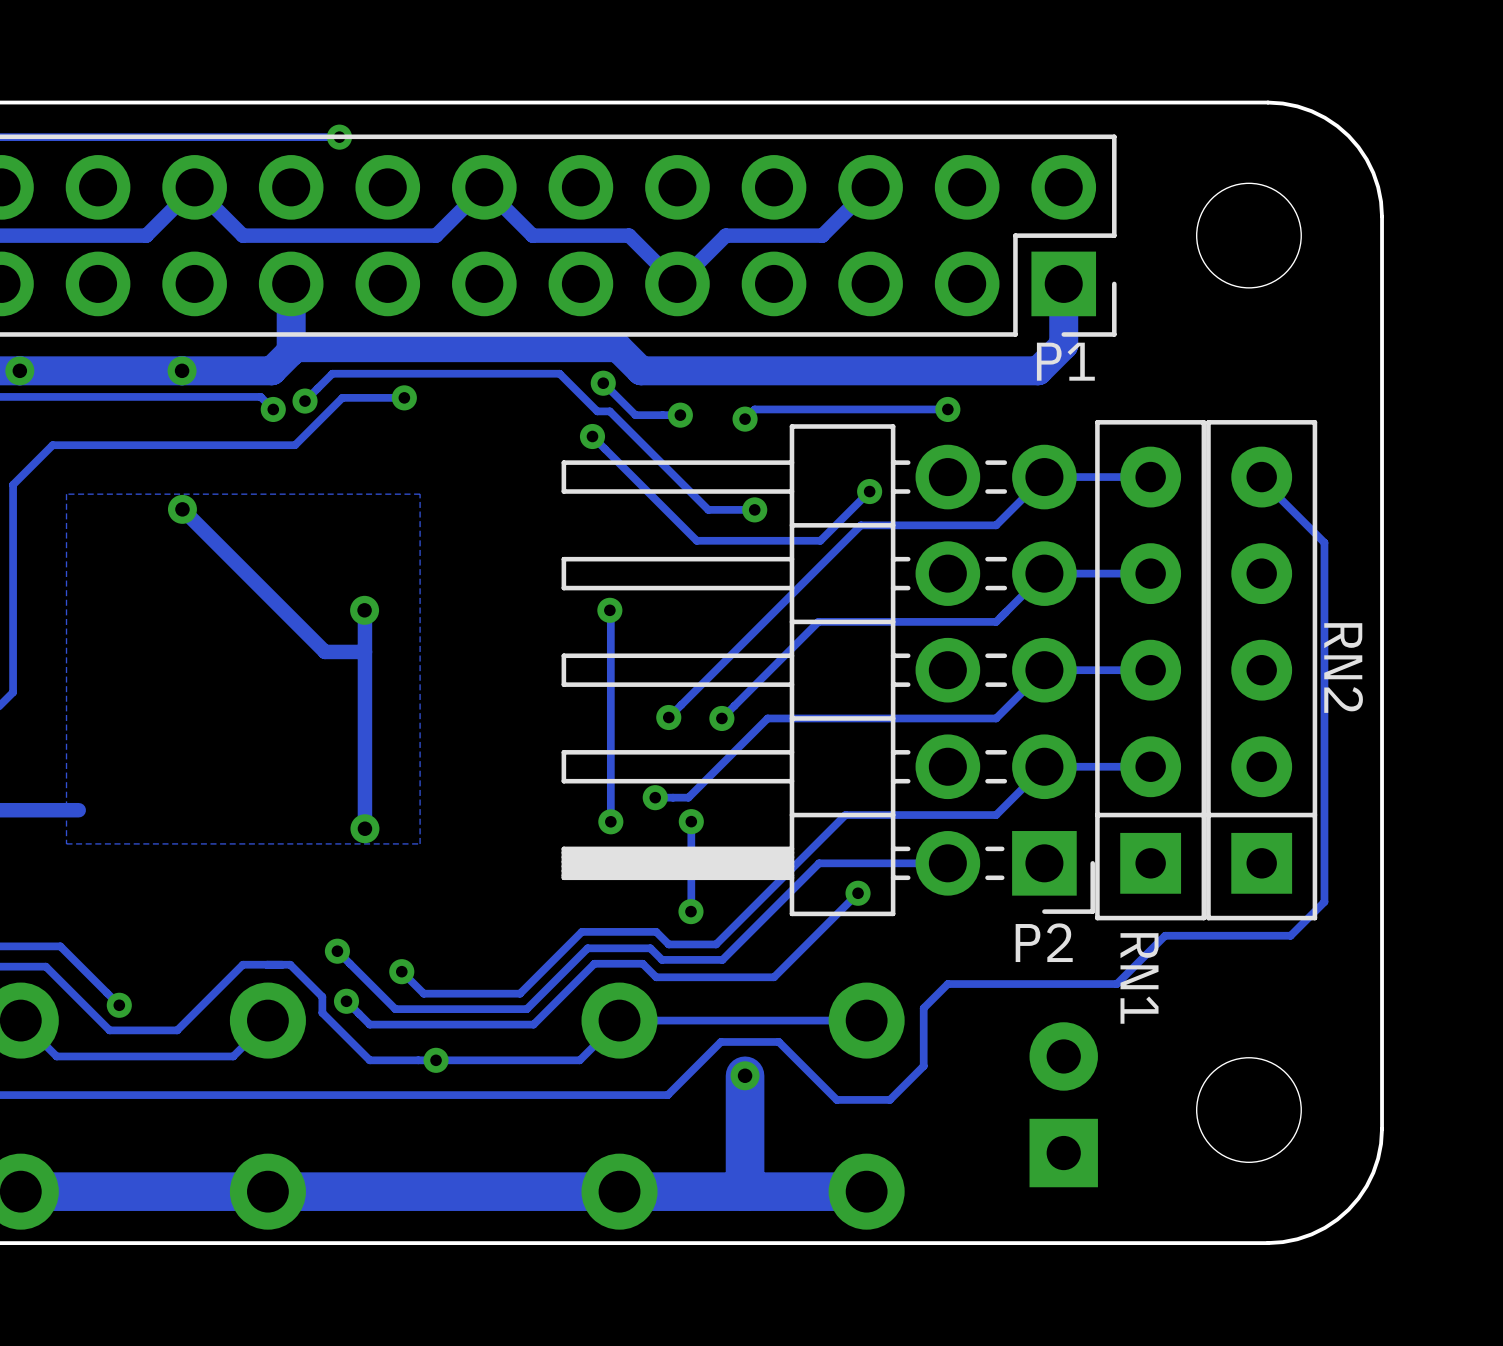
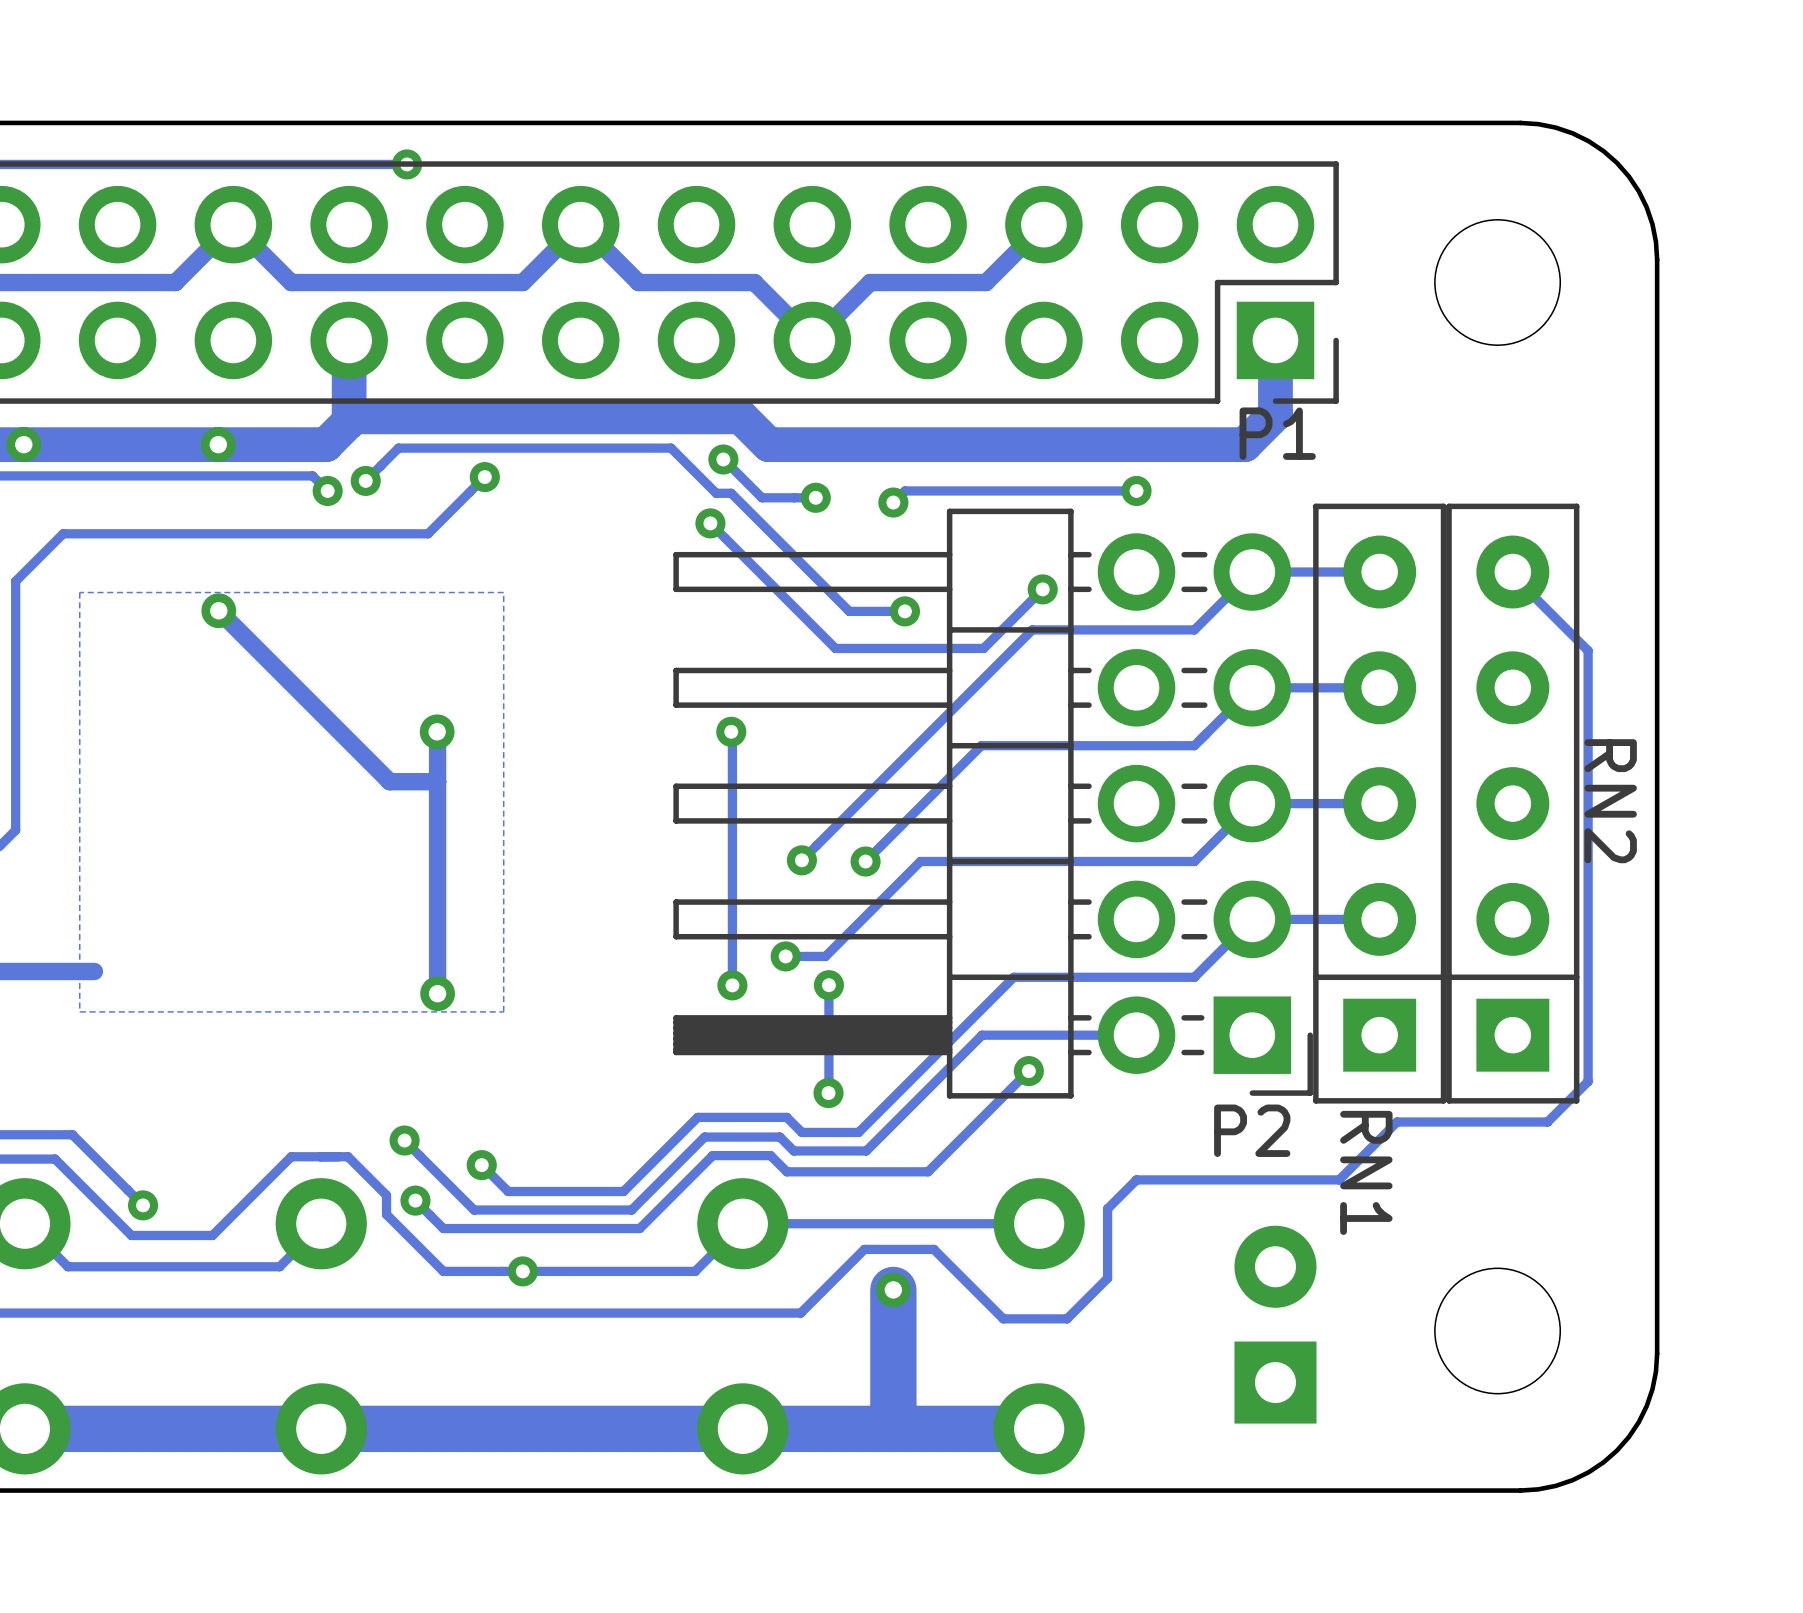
track: (404, 397) (342, 397) (295, 445) -> (484, 477) (428, 533) (353, 533)

